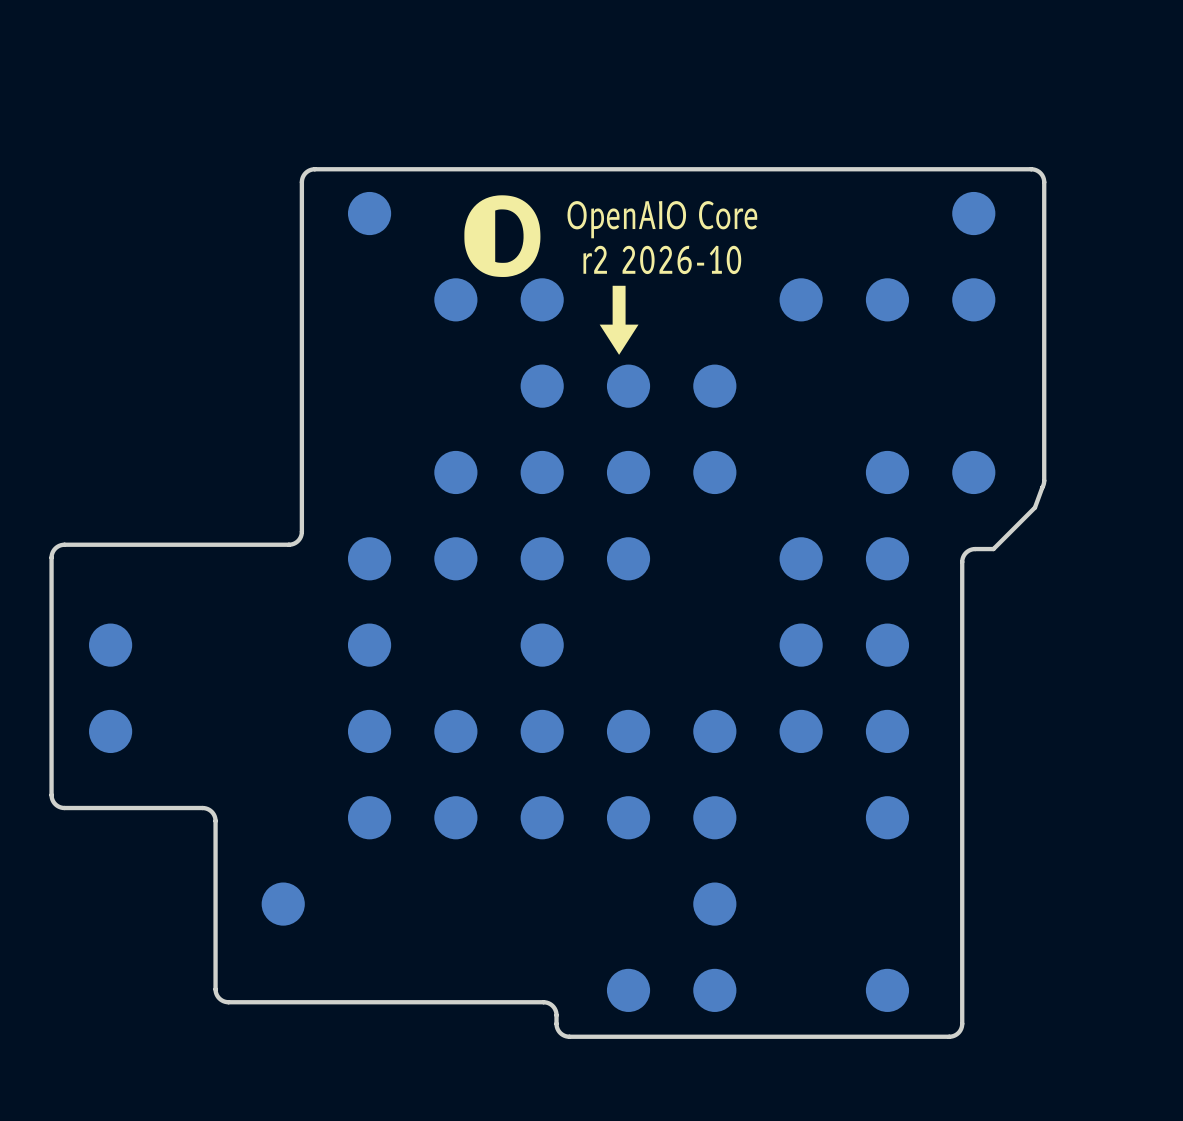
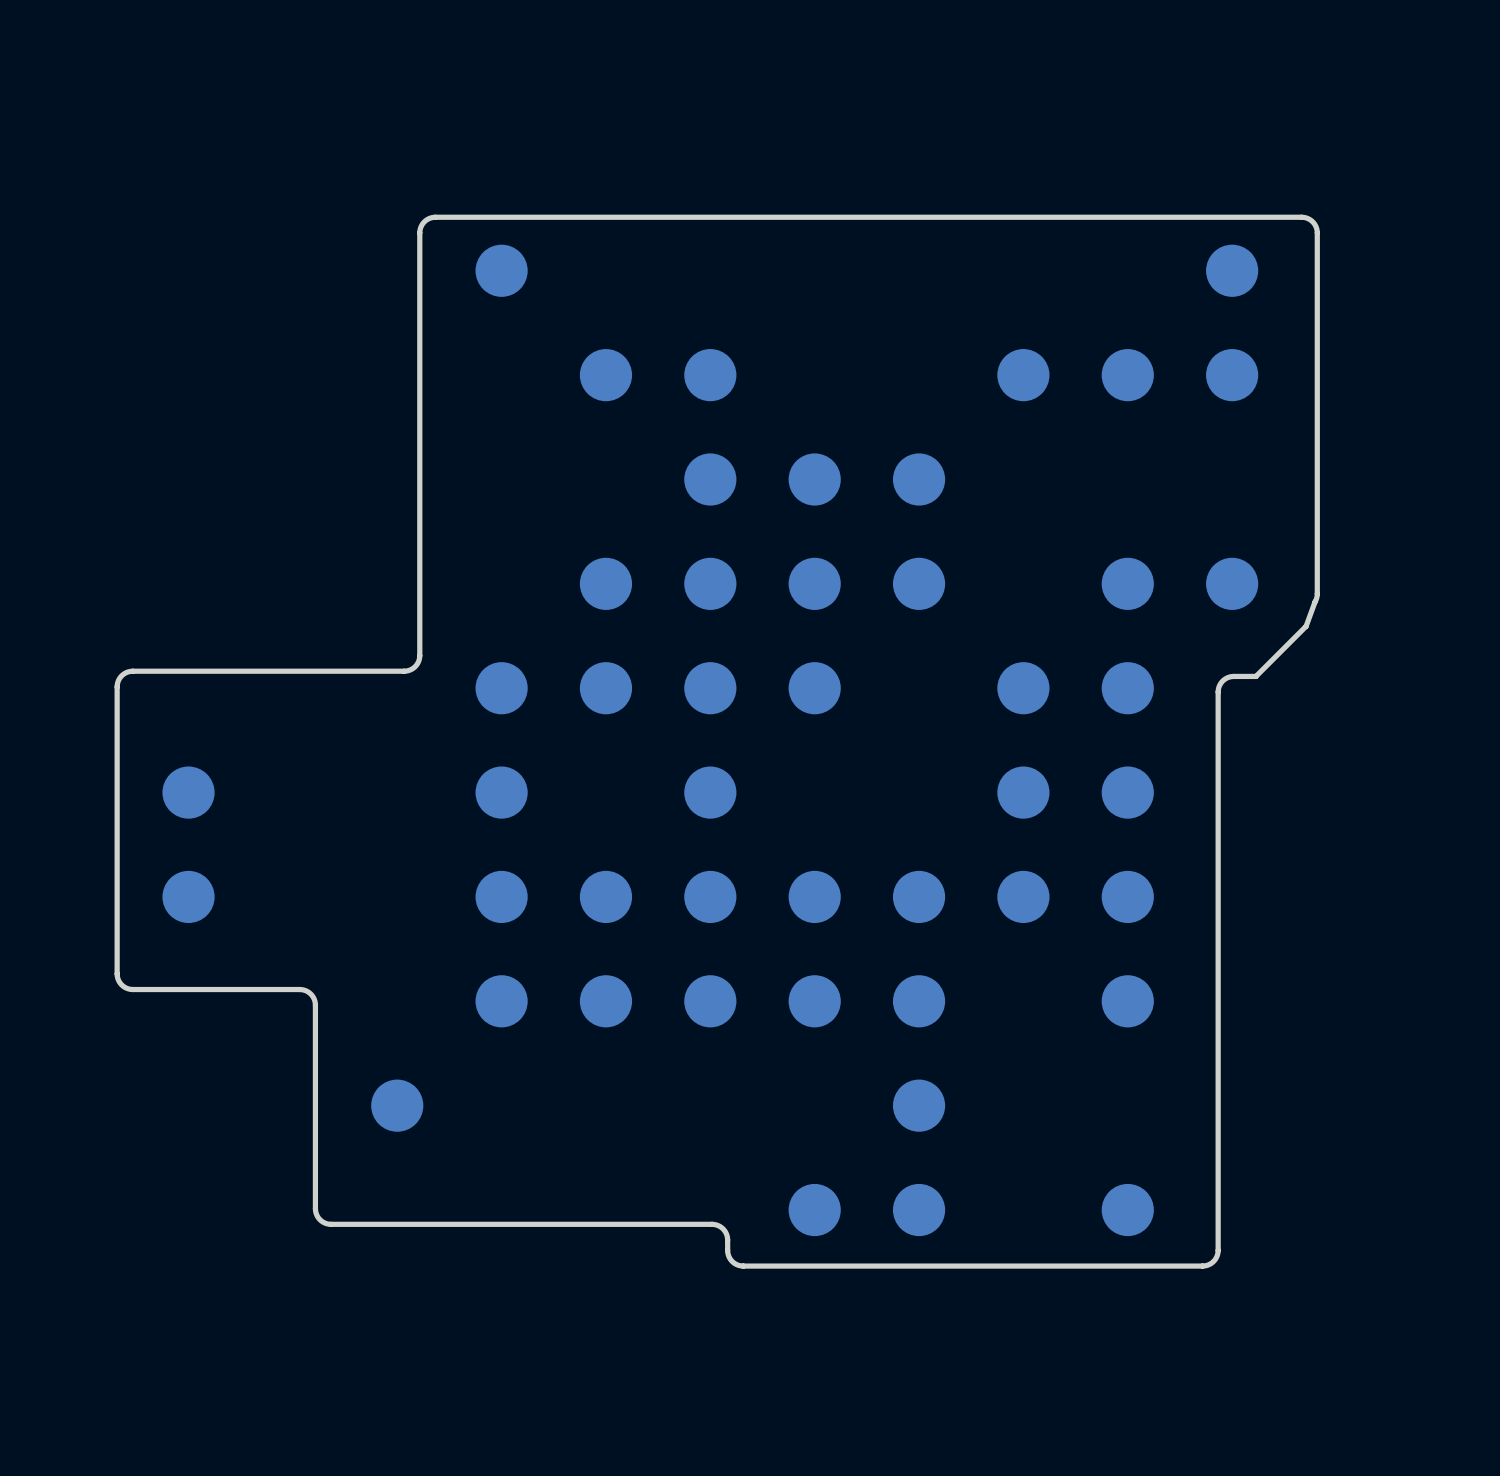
drawing: [464, 195, 541, 278] -> none
text: OpenAIO Core (662, 219) -> none
text: r2 2026-10 (662, 259) -> none
drawing: [599, 285, 639, 355] -> none

